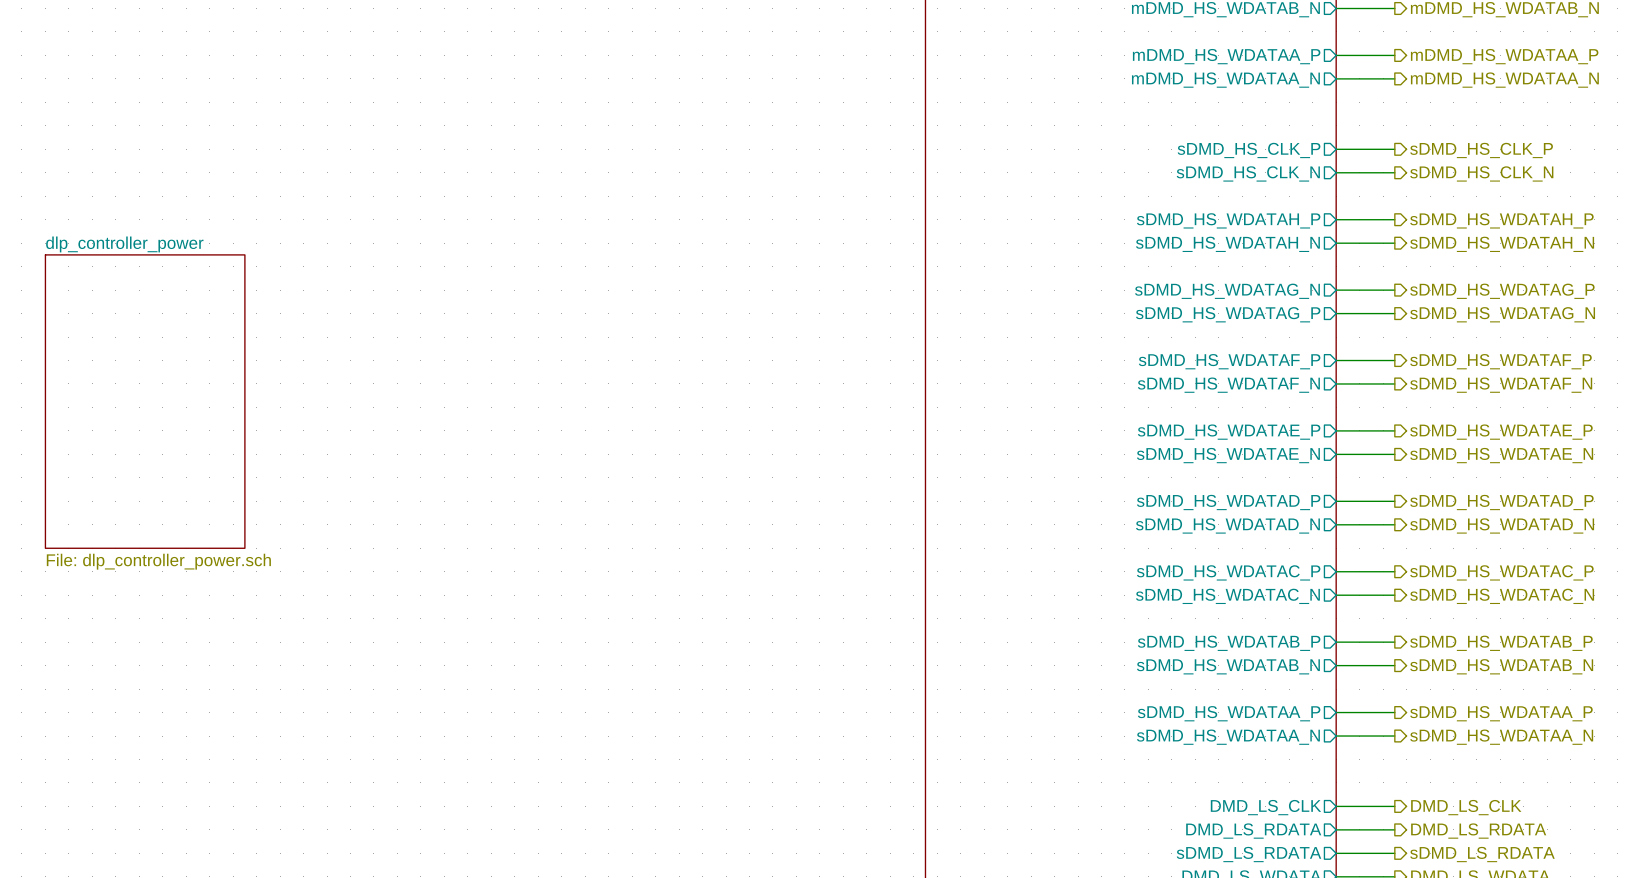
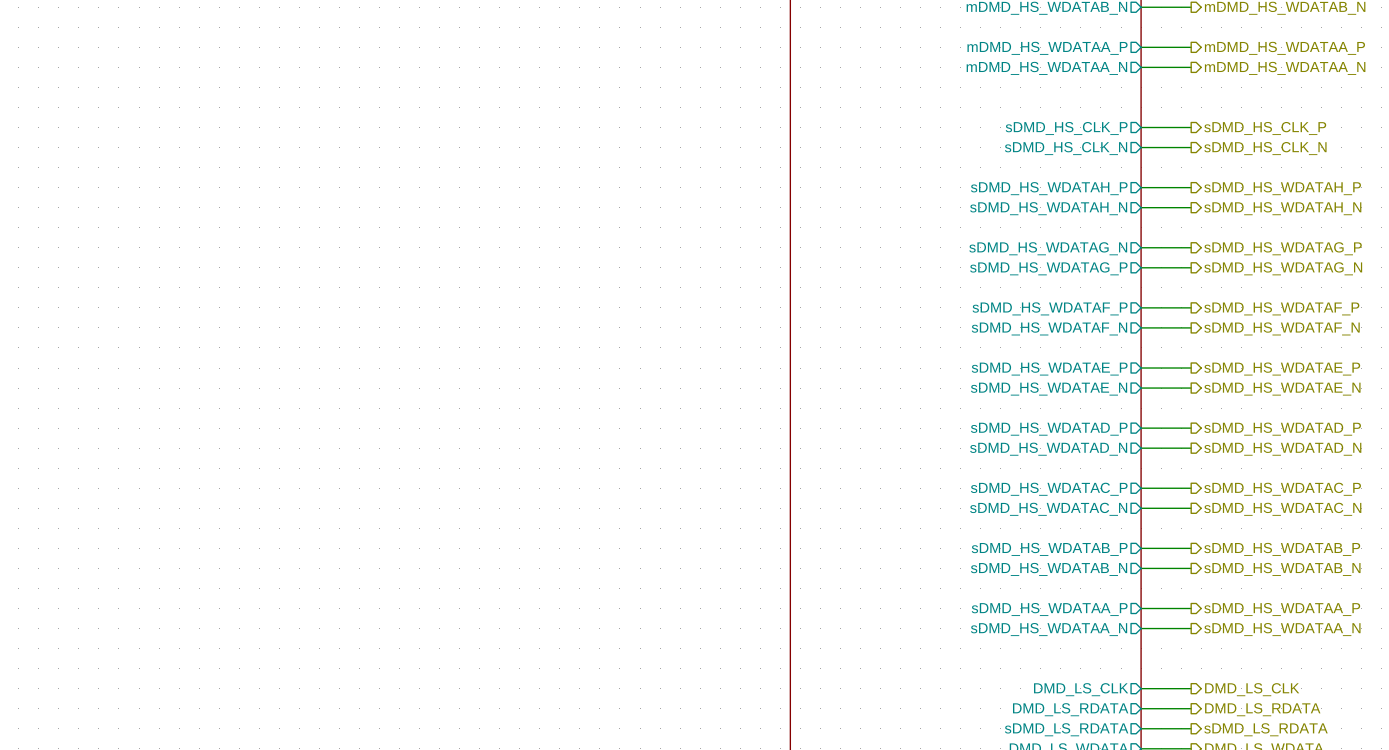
sheet dlp_controller_power: File: dlp_controller_power.sch (145, 401) -> none

